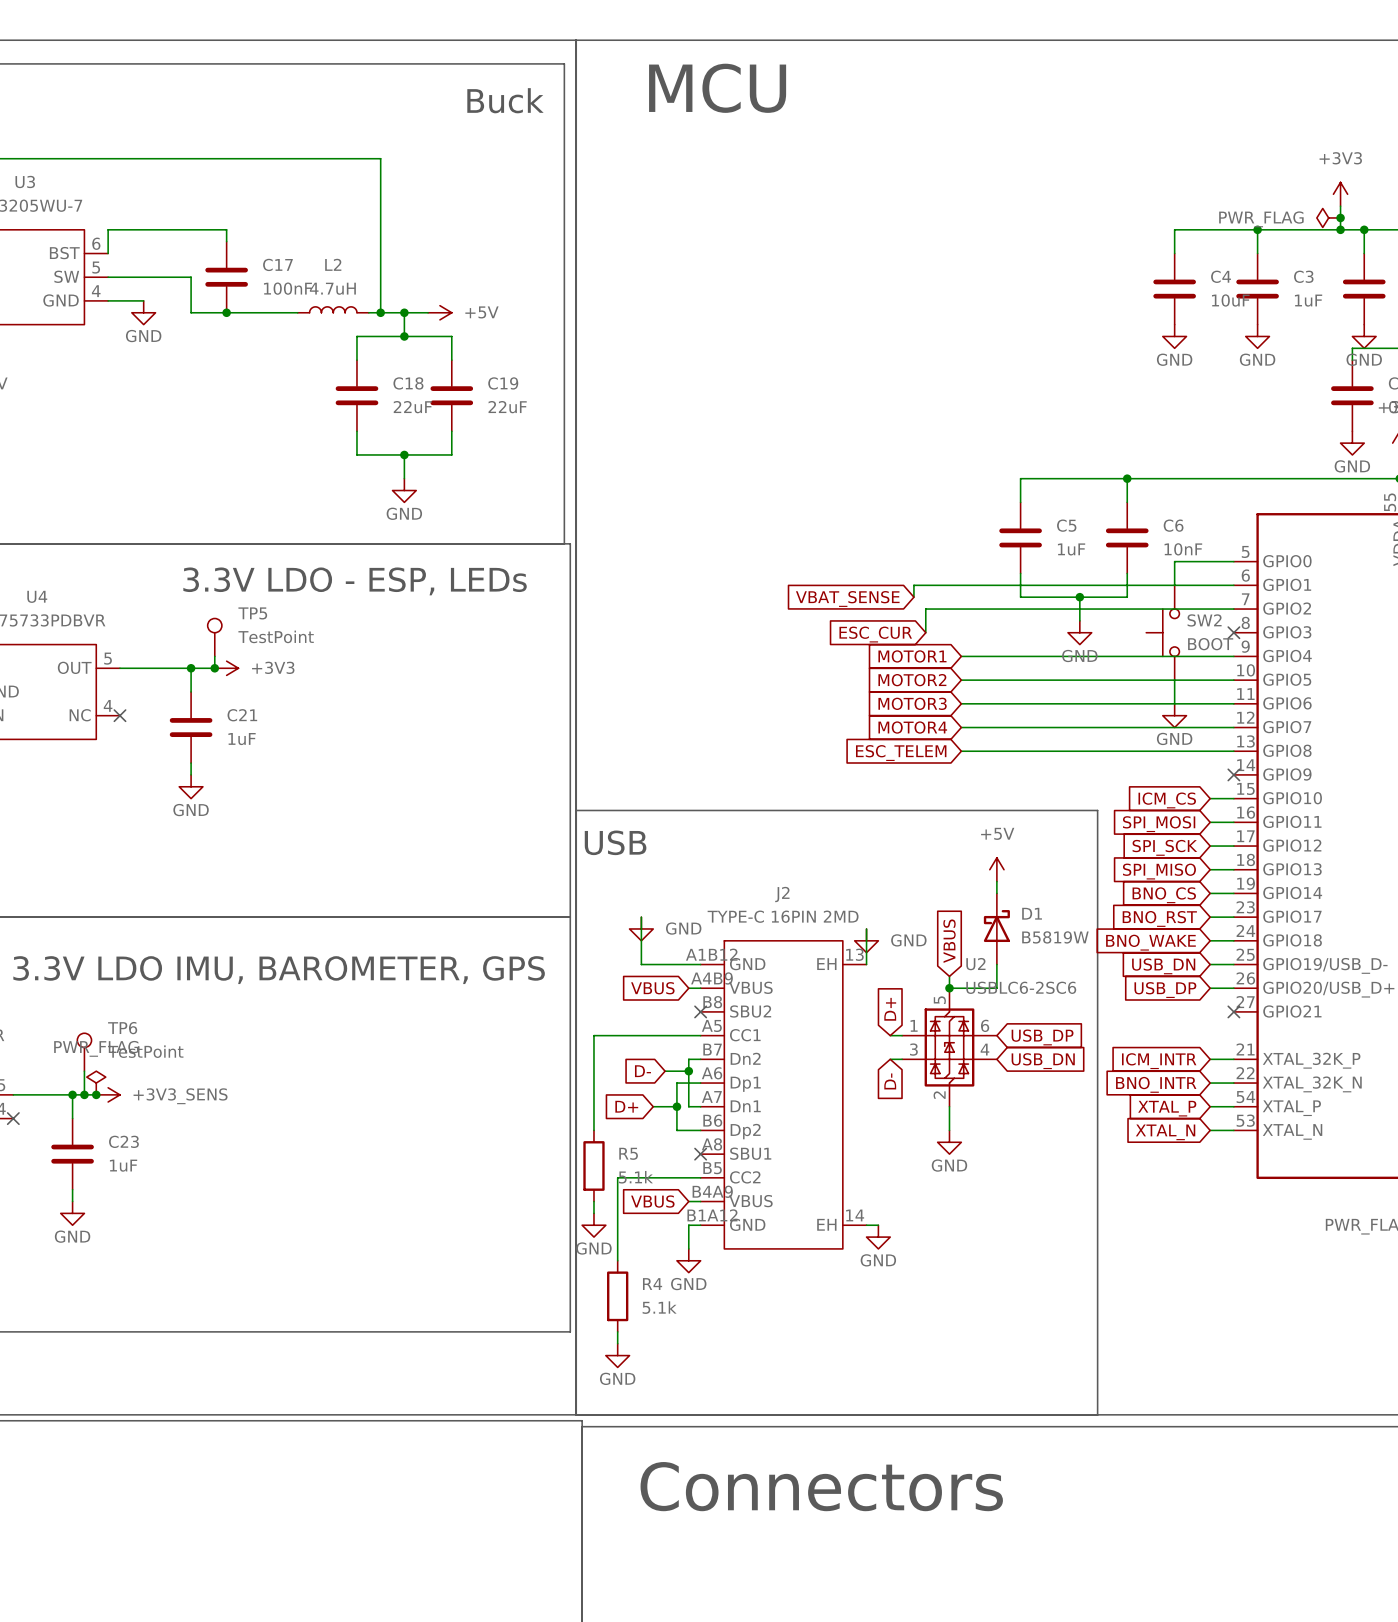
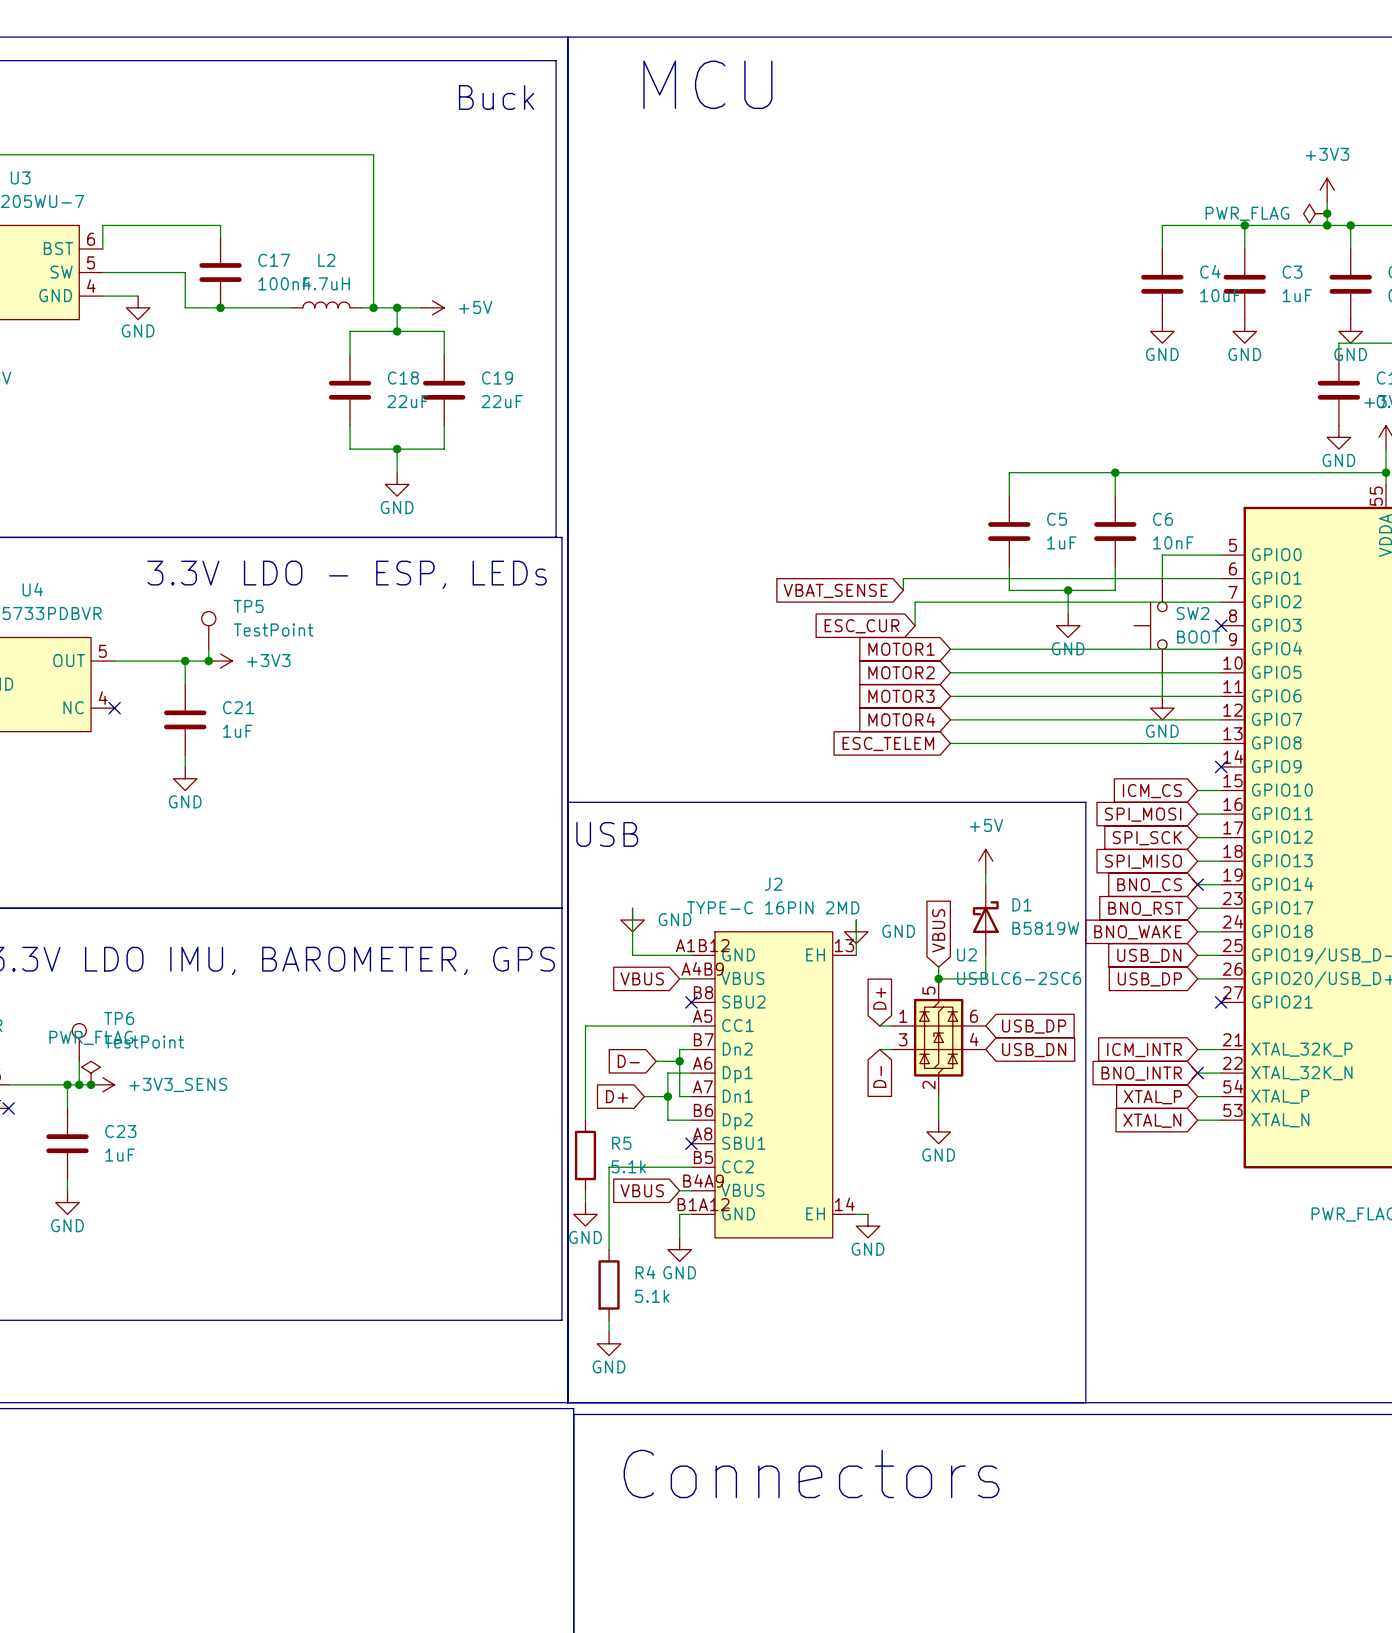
no-connect mark: none -> (1197, 884)
no-connect mark: none -> (1197, 1073)

